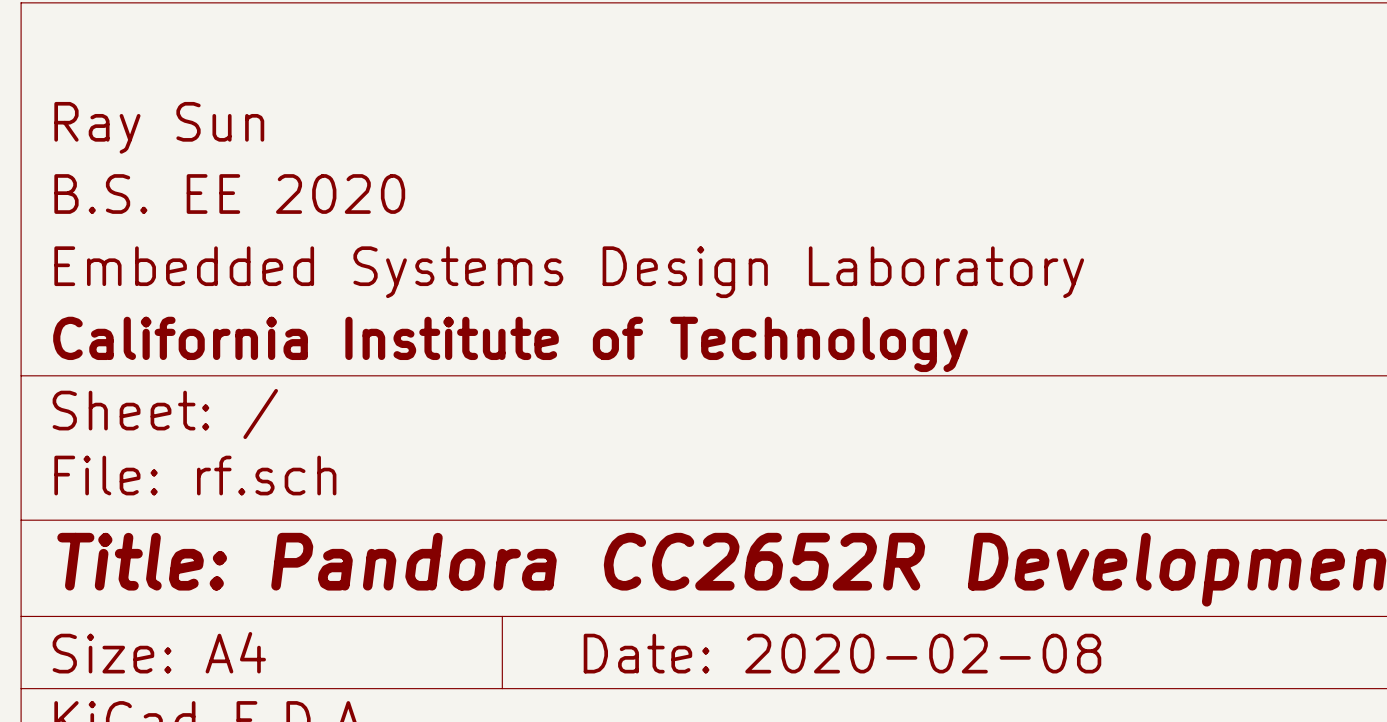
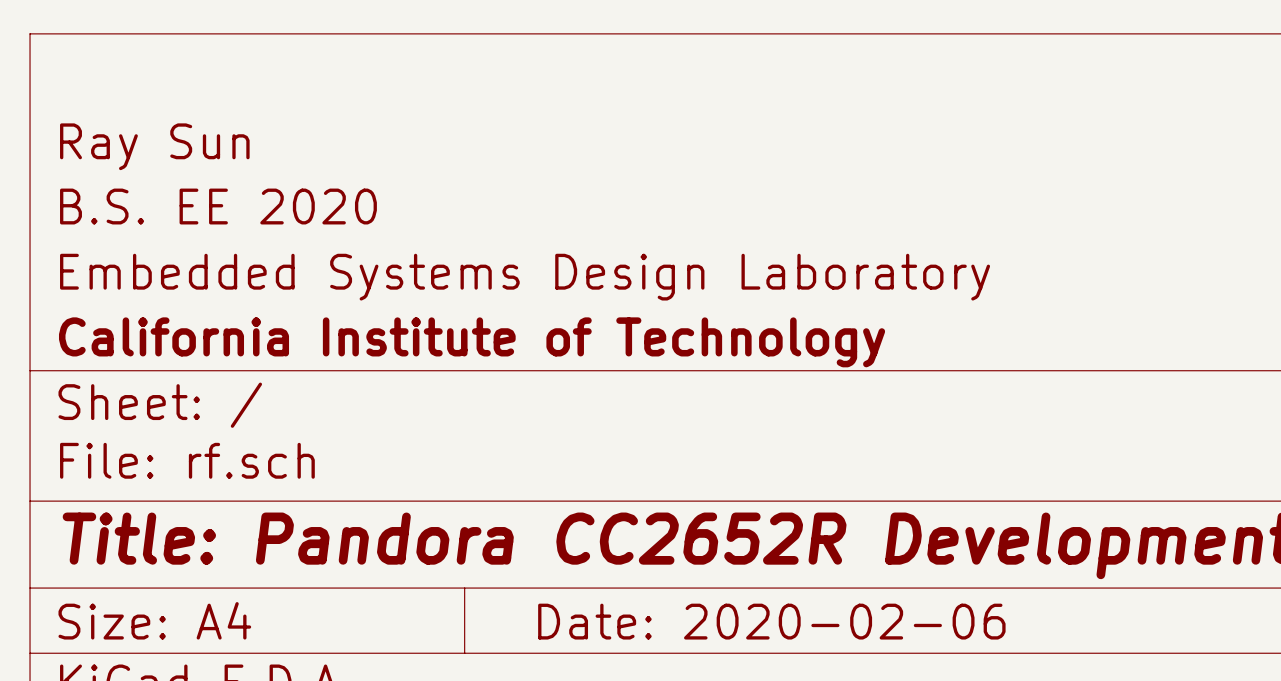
title block: Date: 2020-02-08 (842, 653) -> Date: 2020-02-06 (771, 621)

